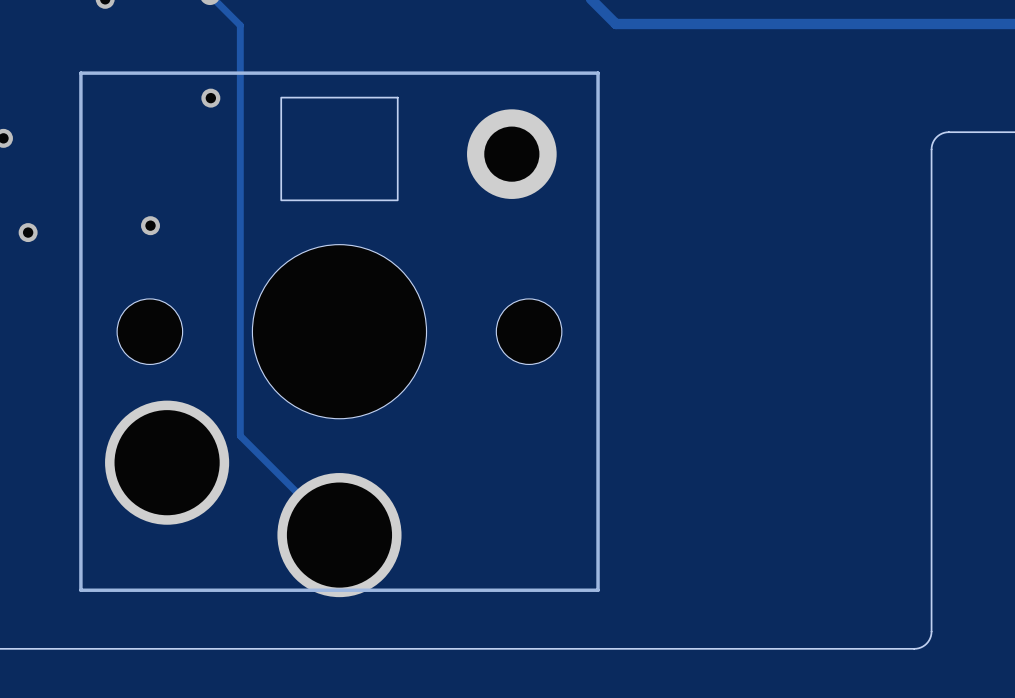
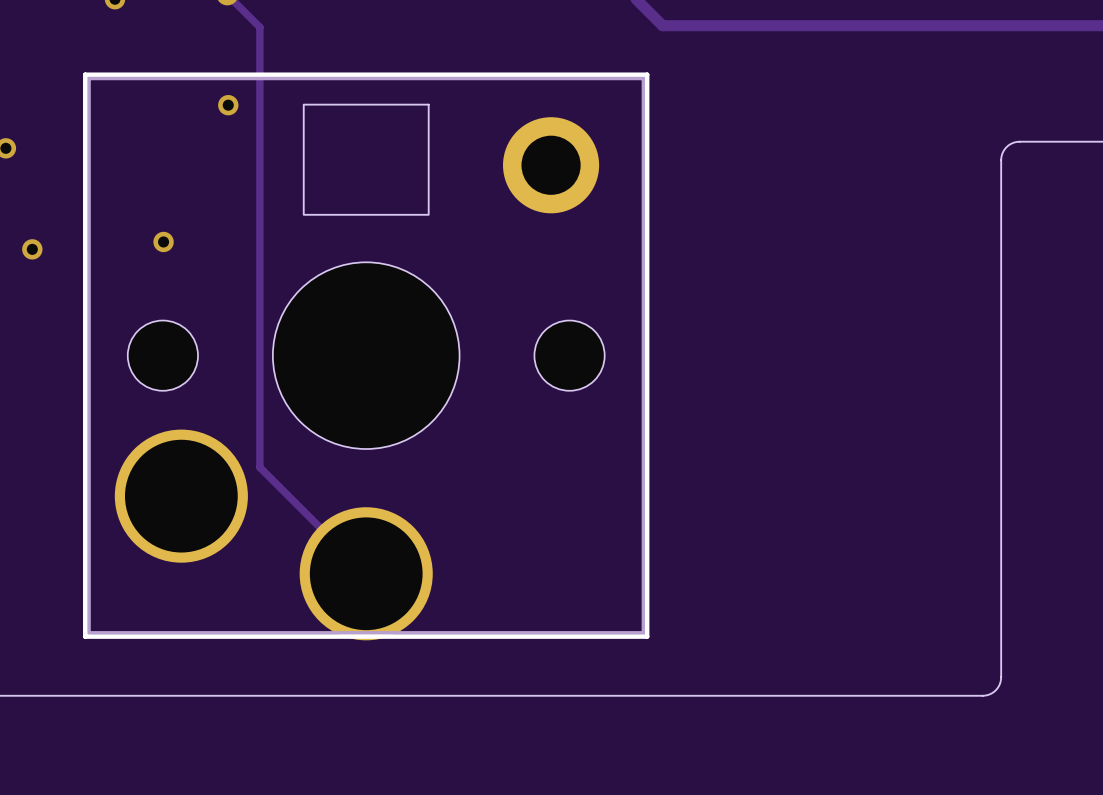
part footprint: [79, 71, 600, 598] -> [83, 72, 650, 641]

